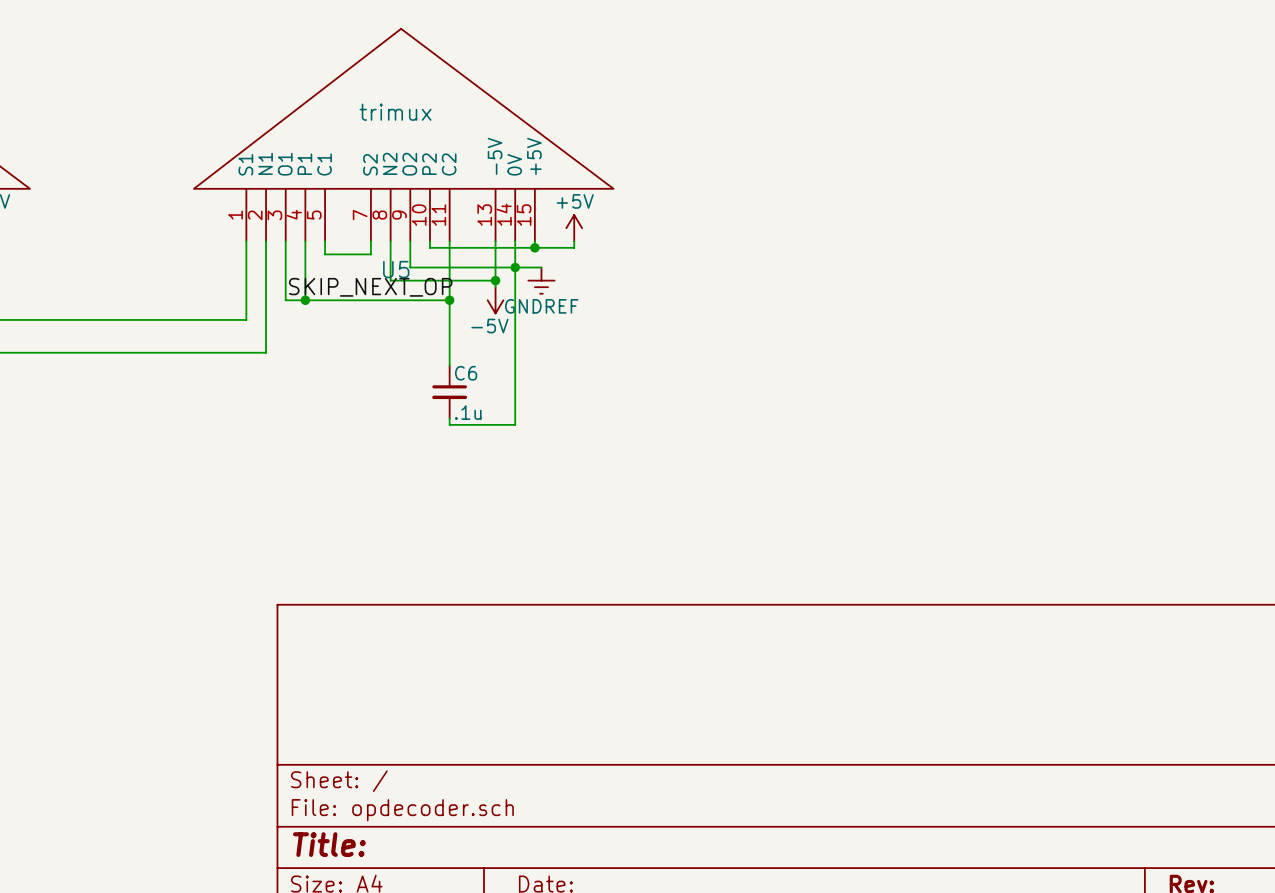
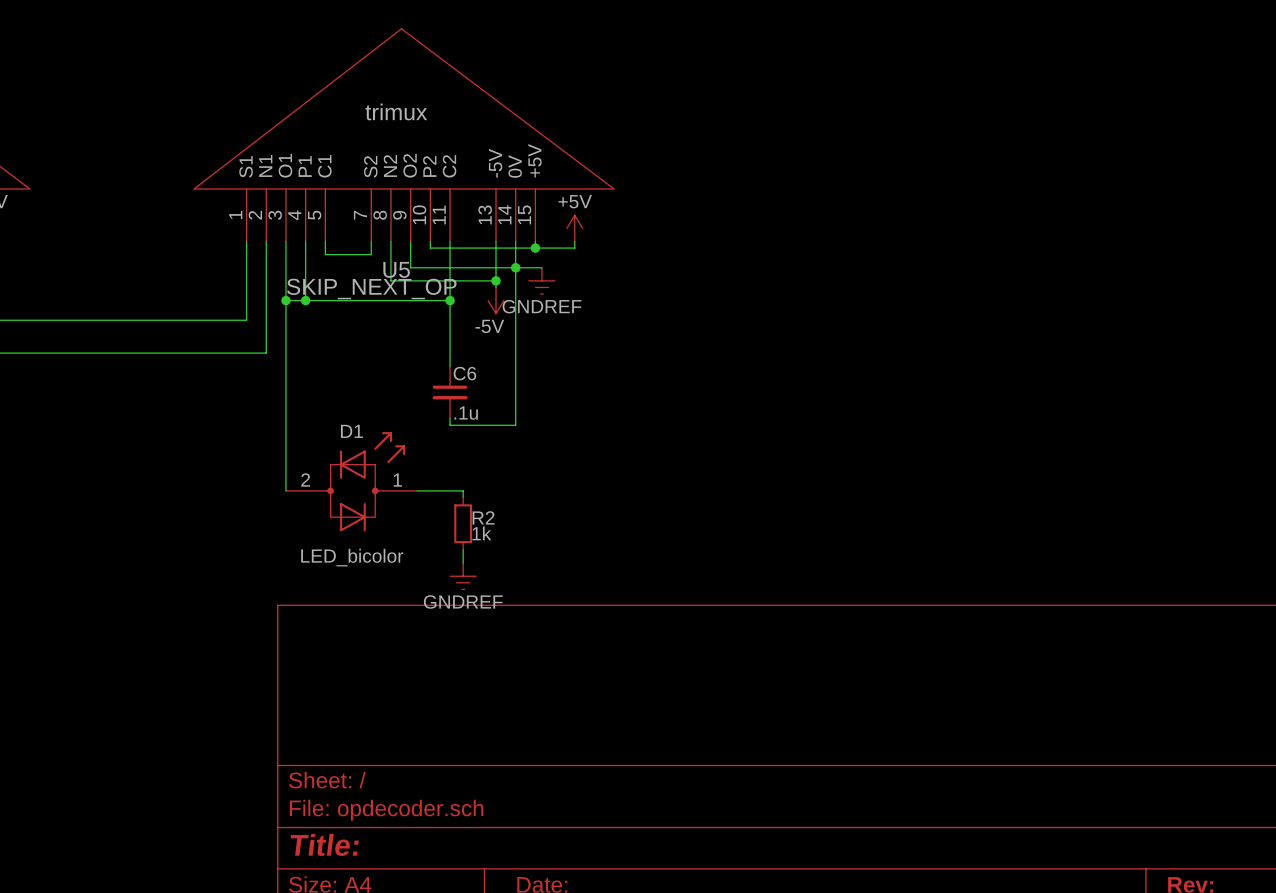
wire: none -> (285, 300) (285, 490)
junction: none -> (285, 300)
D1: none -> LED_bicolor (351, 481)
wire: none -> (417, 490) (463, 490) (463, 497)
R2: none -> 1k (463, 523)
wire: none -> (463, 549) (463, 563)
power symbol: none -> GNDREF (463, 576)

